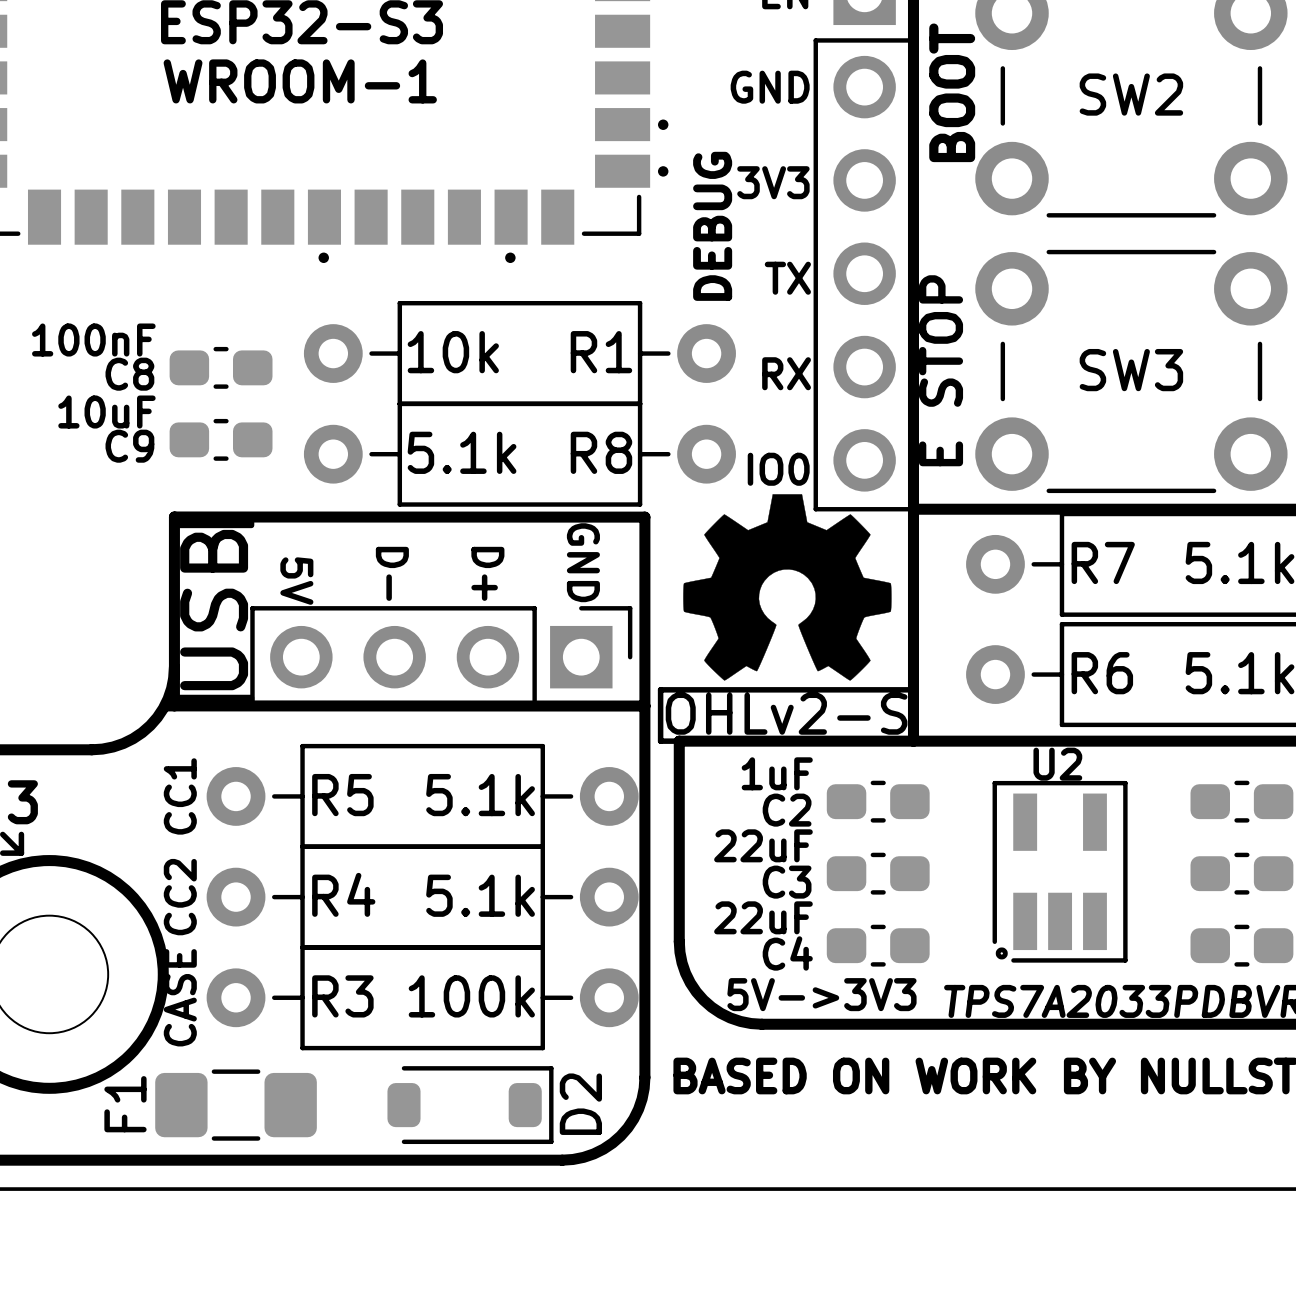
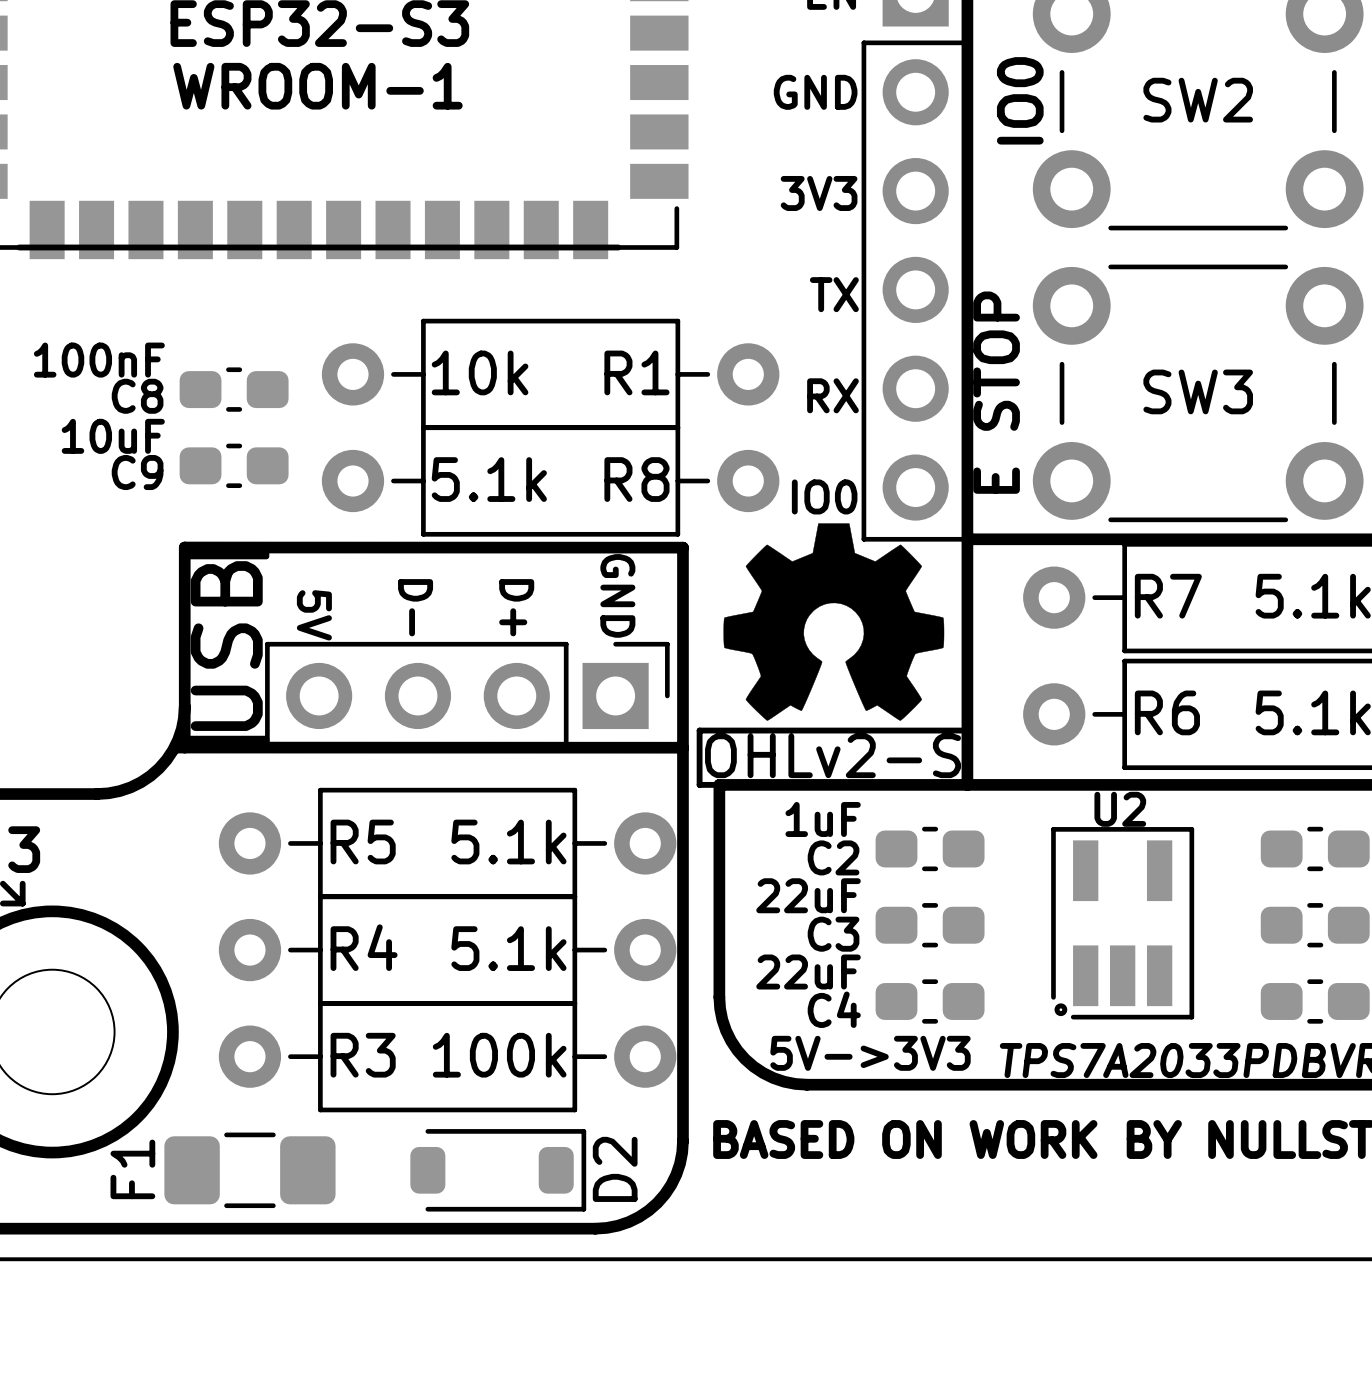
text: BOOT (952, 92) -> IO0 (1020, 100)
drawing: [657, 119, 669, 177] -> none
text: DEBUG (712, 226) -> none
line: none -> (19, 247) (618, 247)
drawing: [318, 252, 329, 264] -> none
drawing: [505, 252, 516, 264] -> none
text: CC1 (180, 796) -> none
text: CC2 (180, 897) -> none
text: CASE (180, 997) -> none

